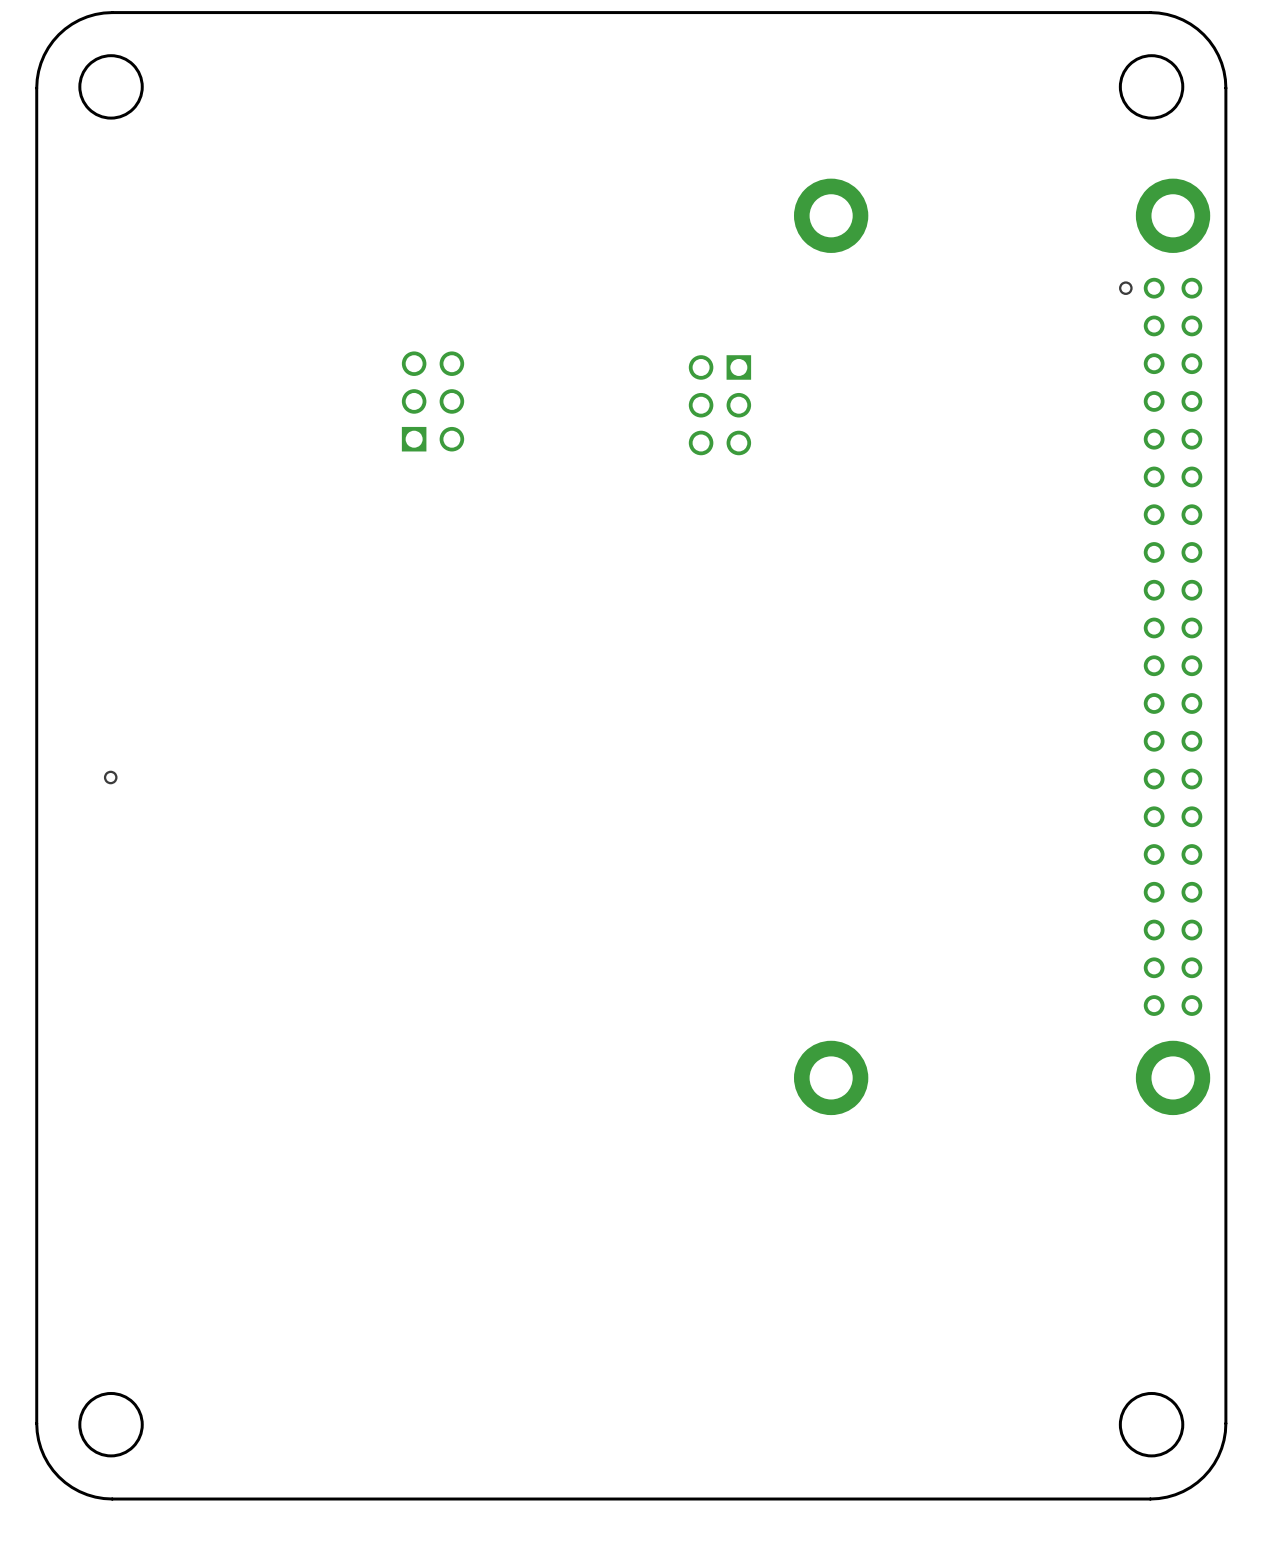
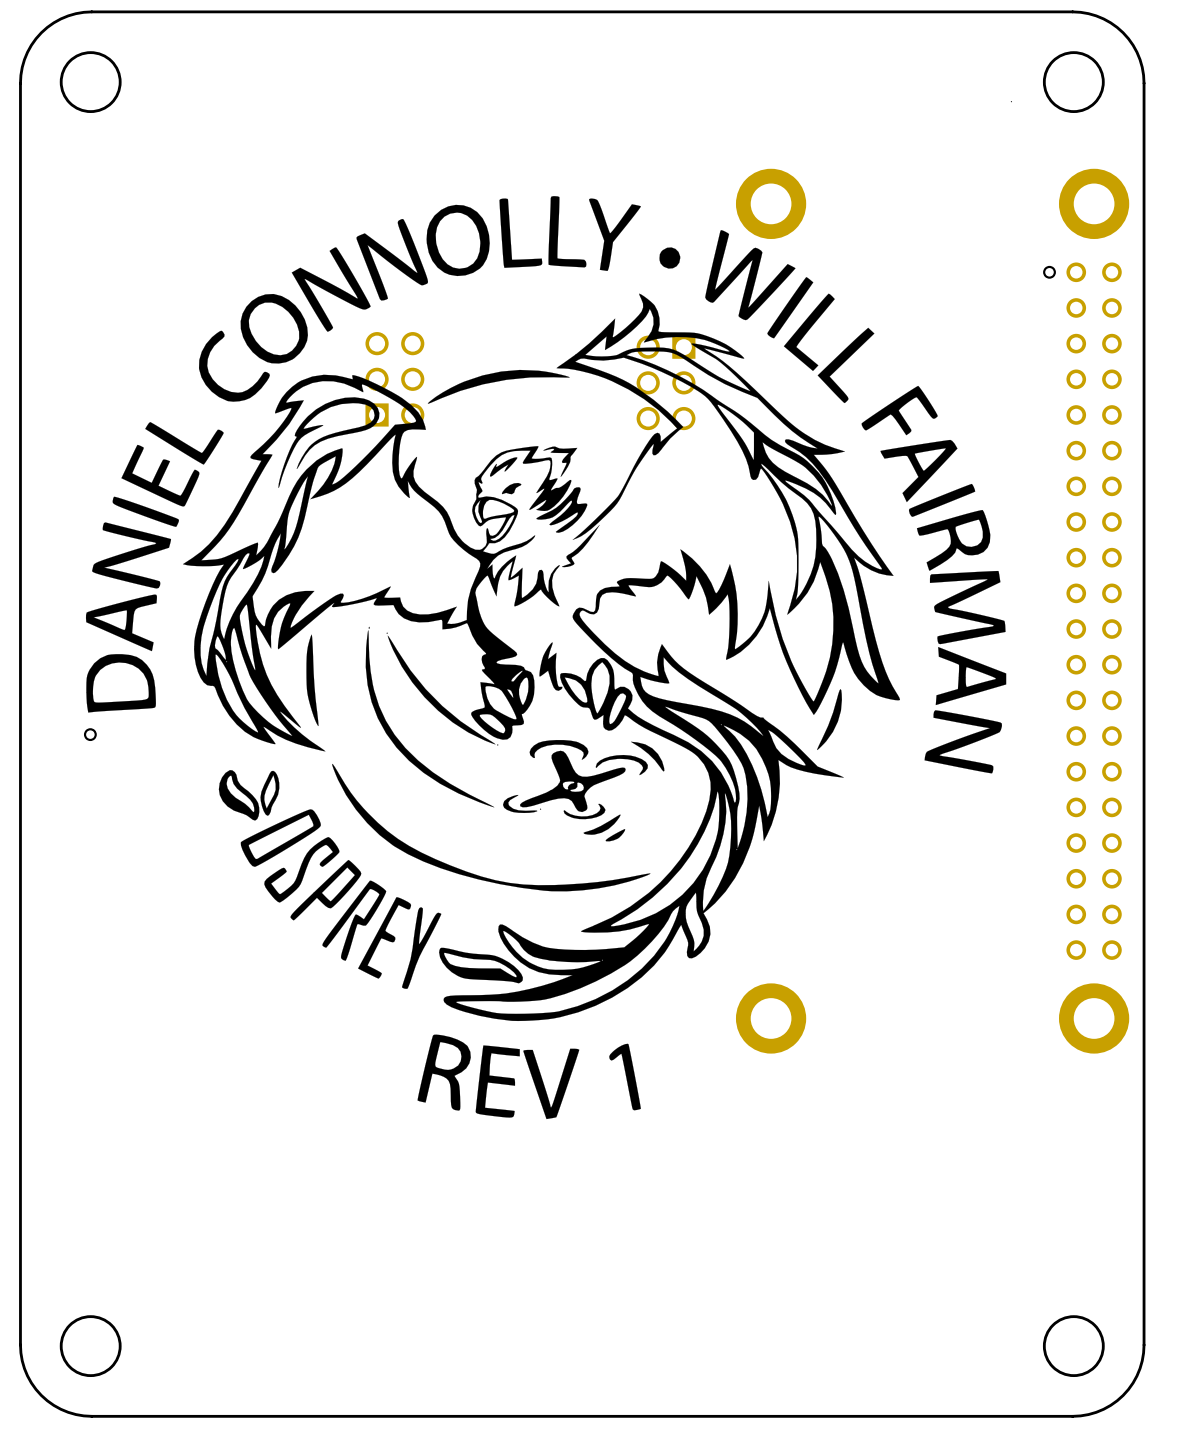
drawing: none -> [85, 100, 1013, 1120]

